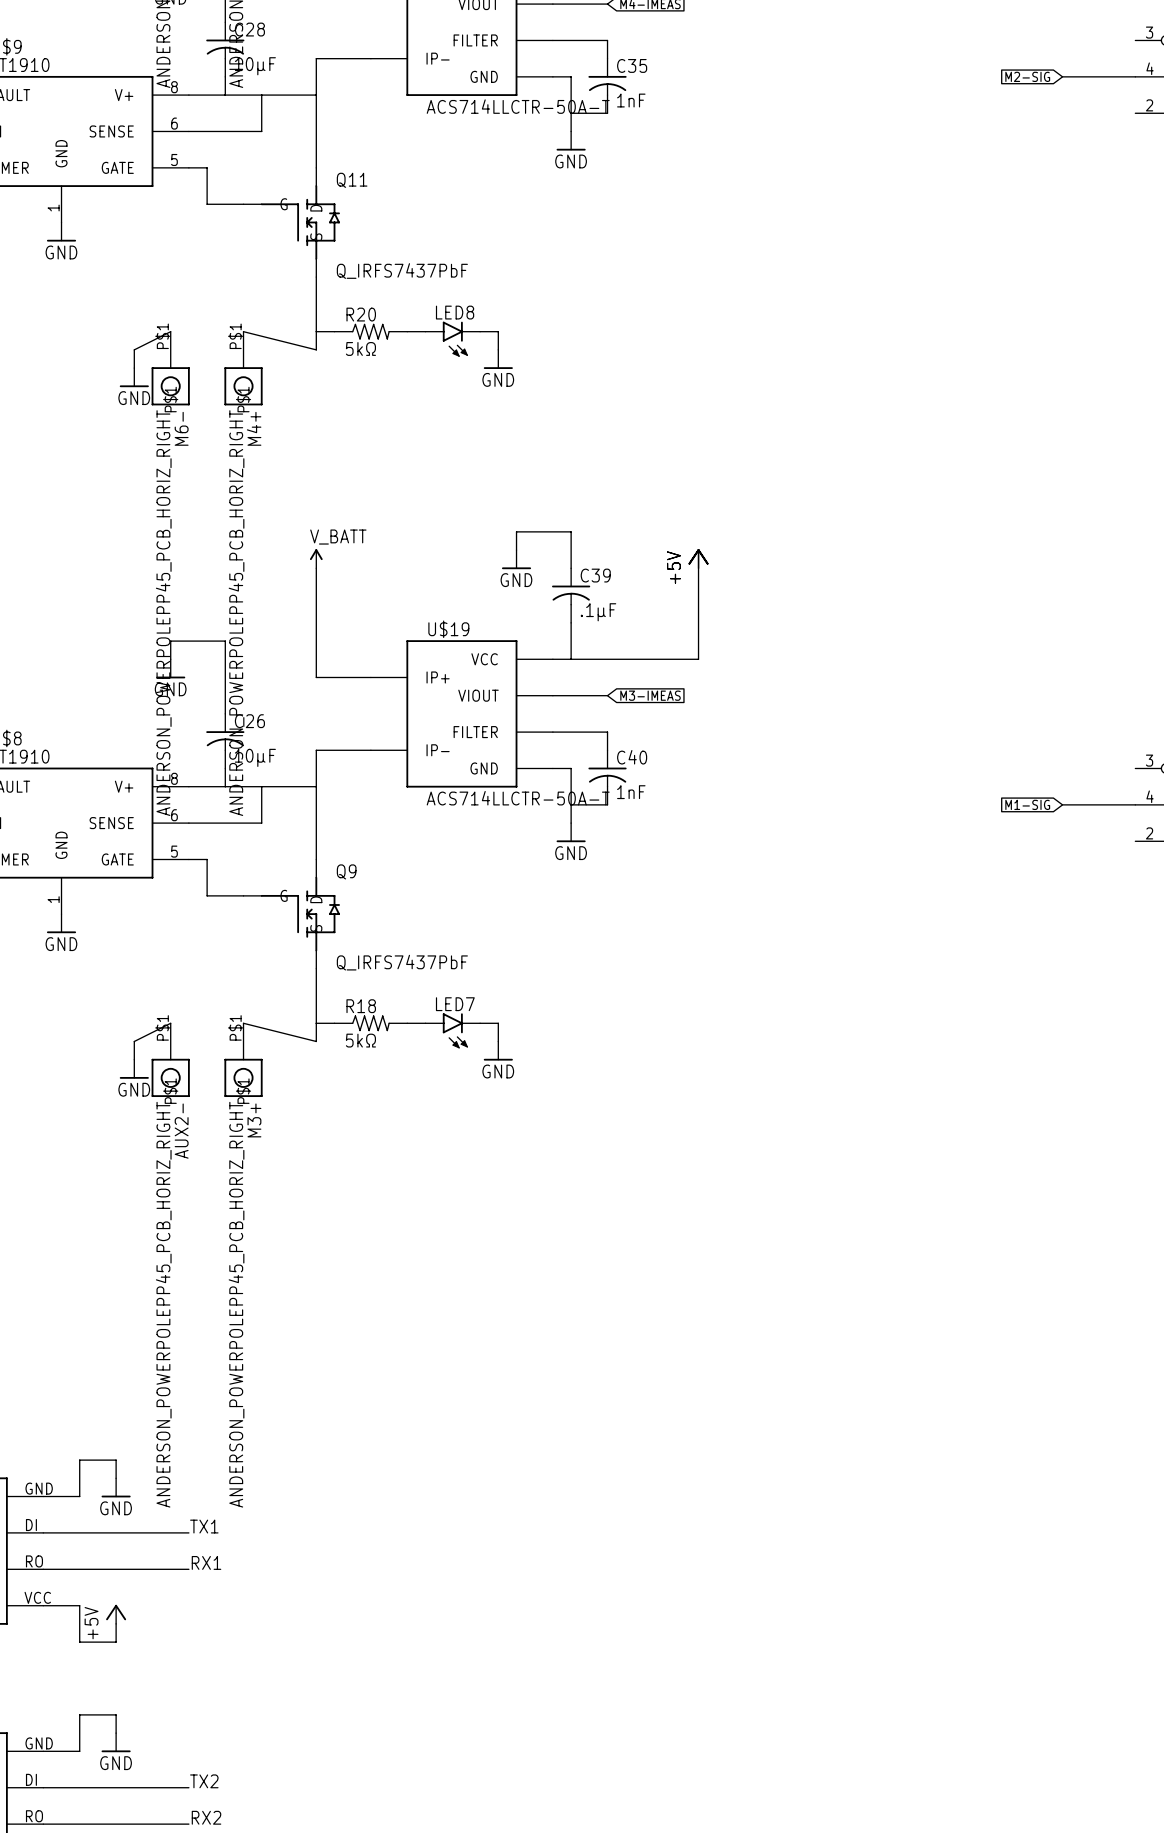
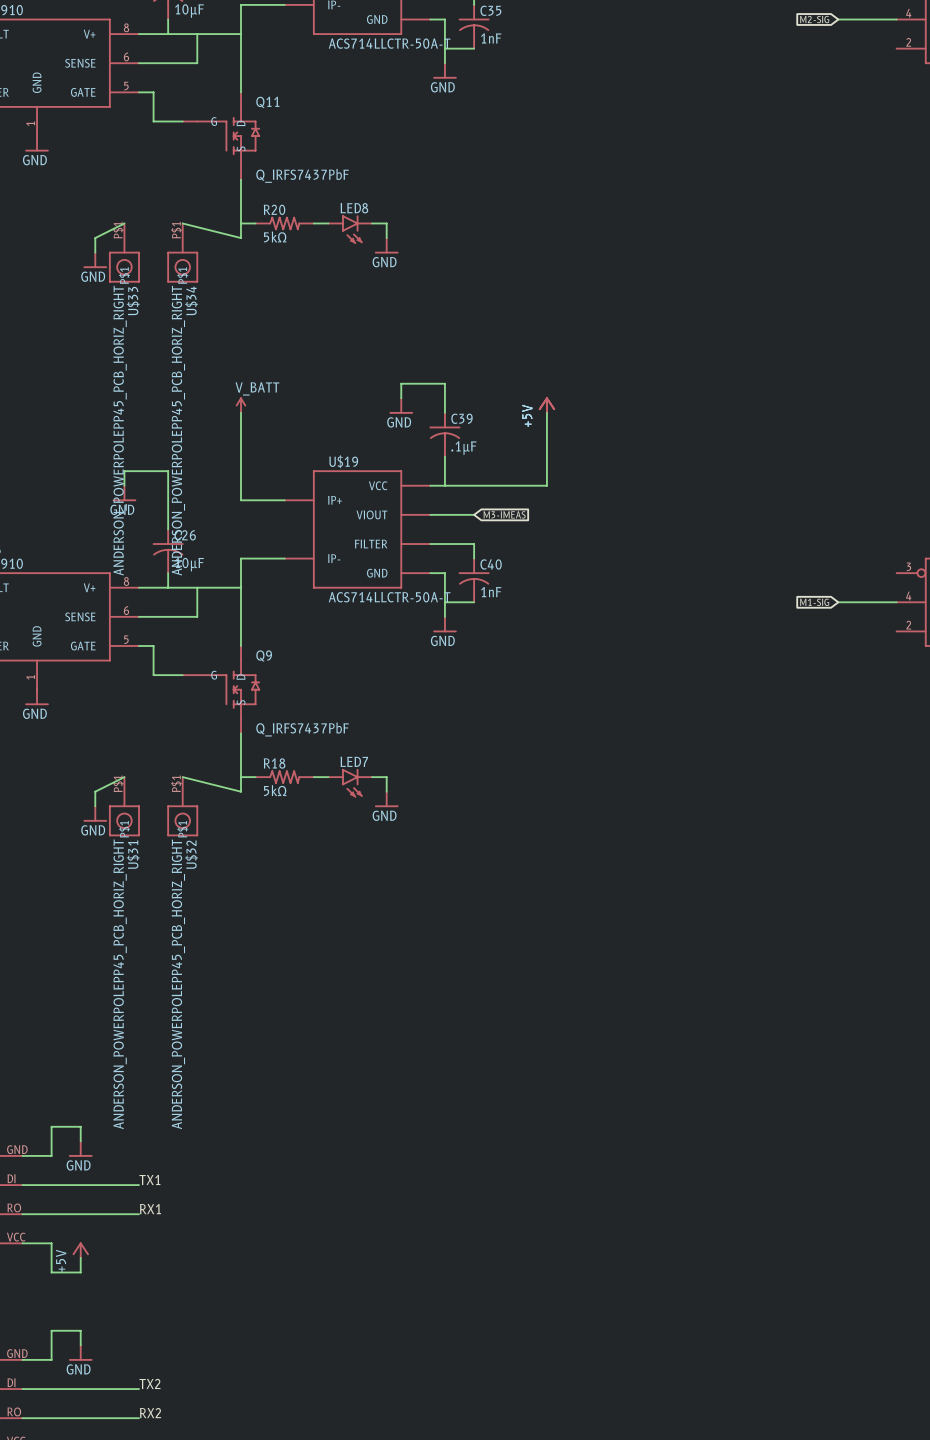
M6- name: M6- (181, 428) -> U$33 (133, 301)
M4+ name: M4+ (254, 428) -> U$34 (191, 300)
M3+ name: M3+ (254, 1120) -> U$32 (191, 854)
AUX2- name: AUX2- (181, 1131) -> U$31 (133, 854)

